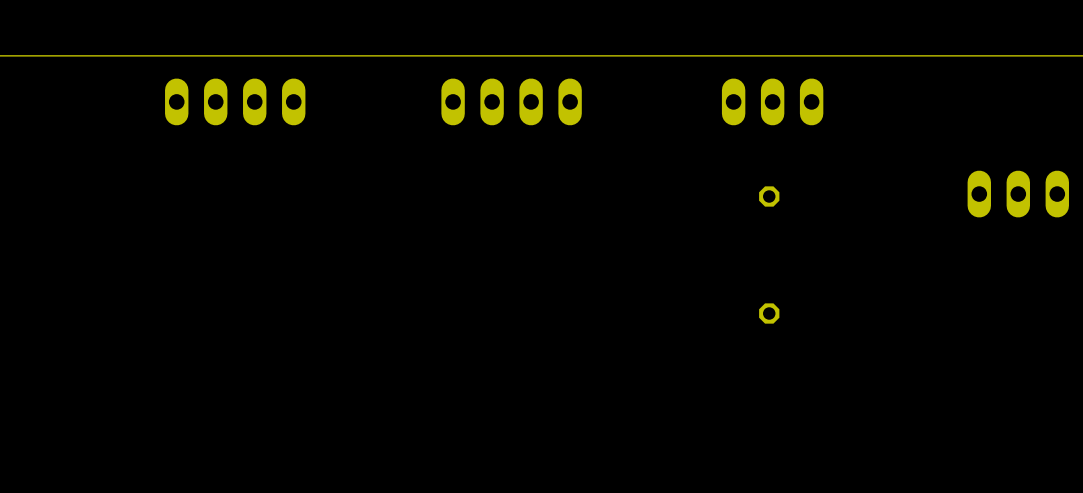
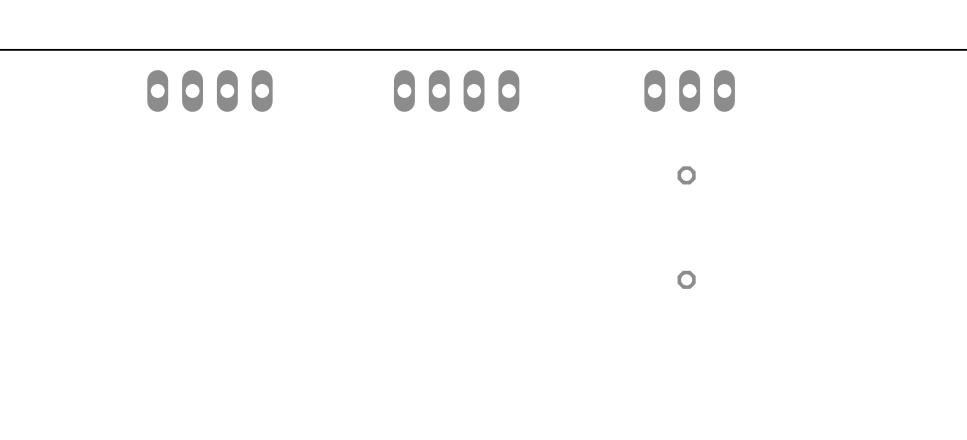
part: (1018, 194) -> none

